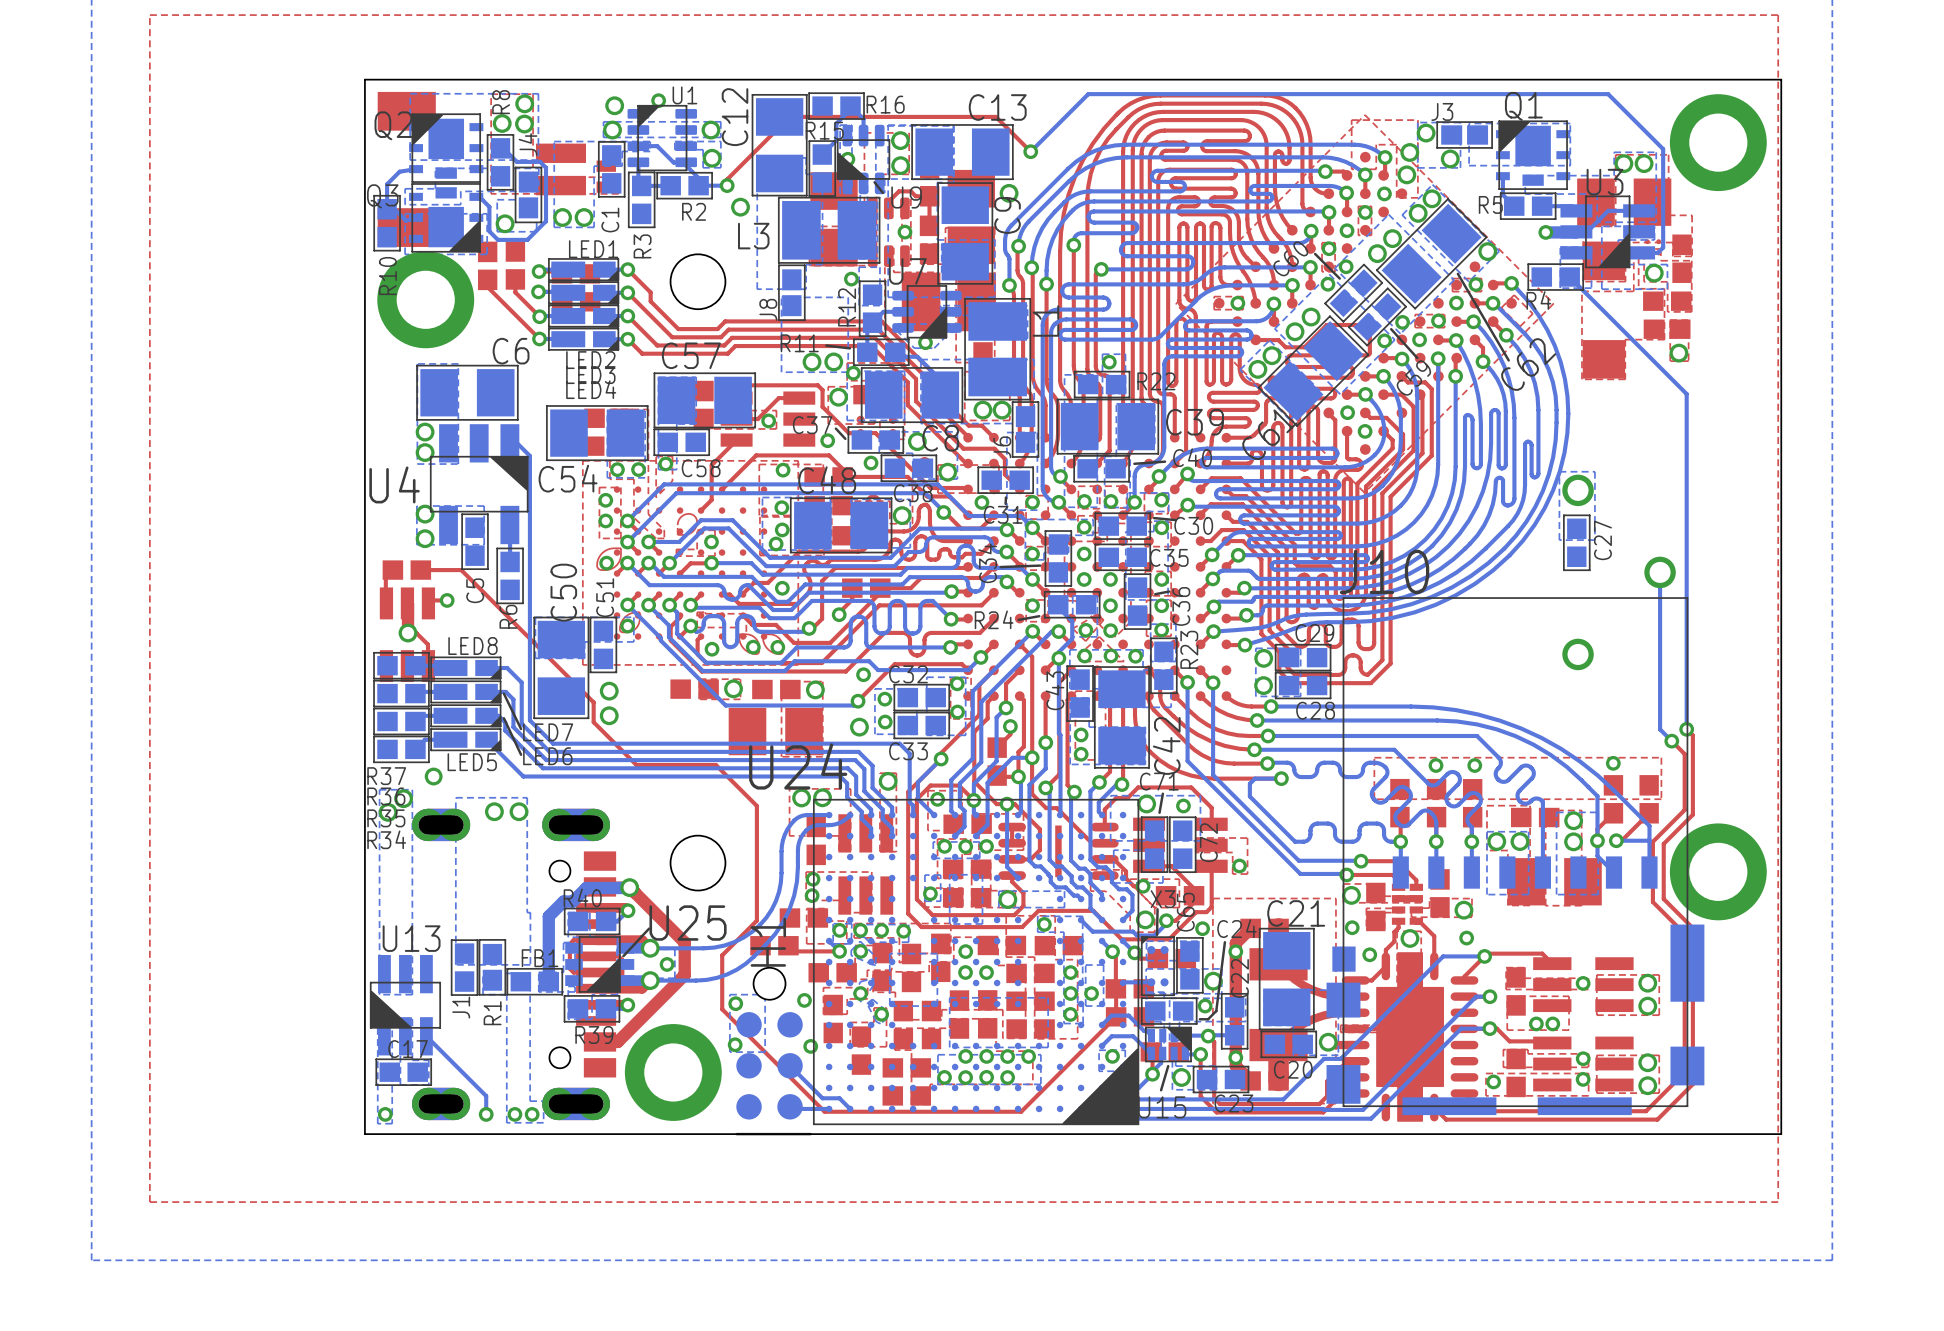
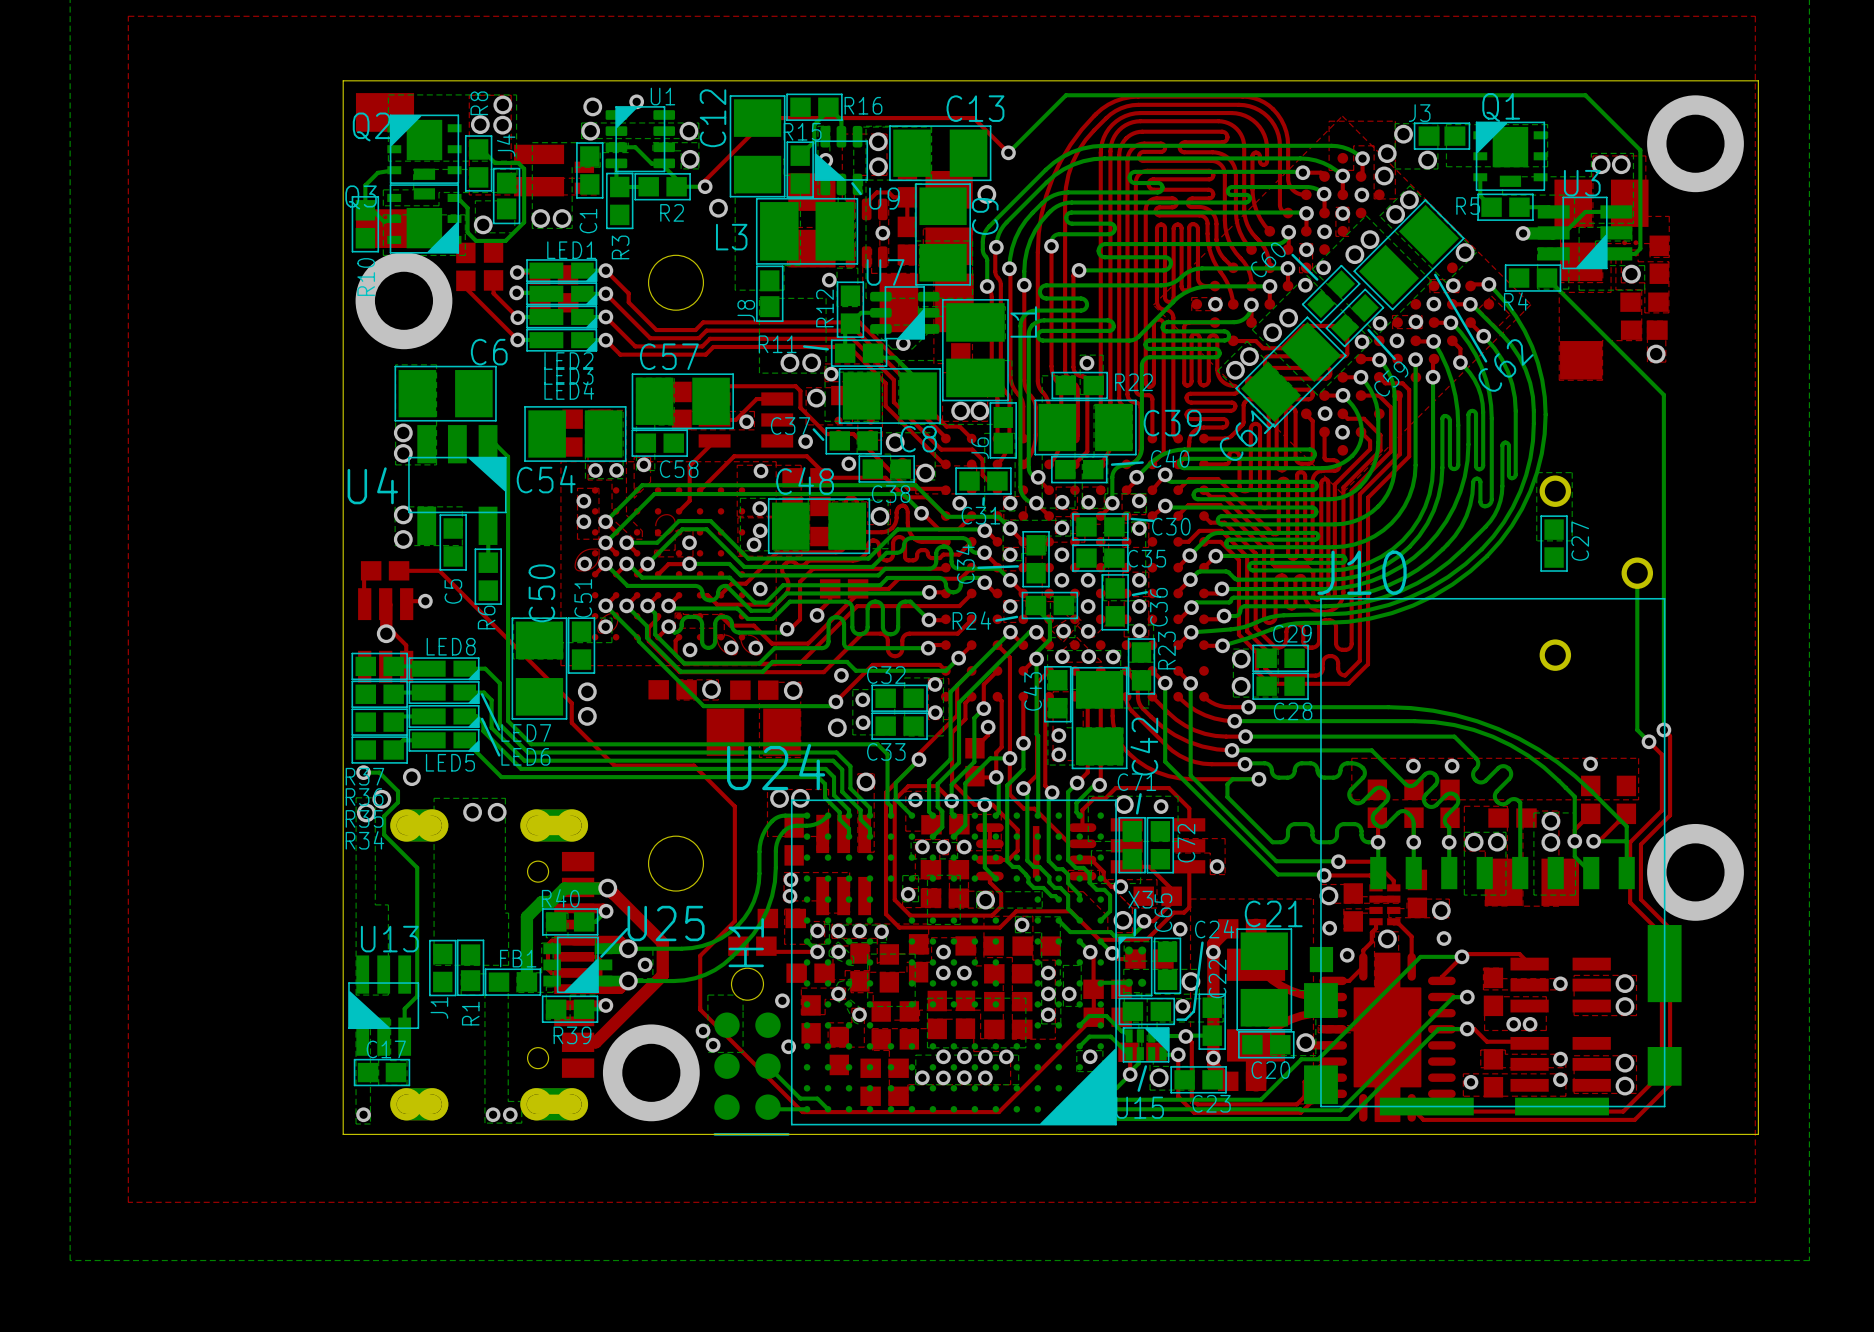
via: none -> (363, 772)
bottom zone outline: (410, 994) (412, 994) (412, 789) (379, 789) (379, 994) -> (388, 995) (388, 904) (375, 904) (375, 797) (356, 797) (356, 995) (357, 995)
via position: (735, 1003) -> (703, 1030)
bottom track: (426, 1036) (486, 1096) (486, 1114) -> (404, 1036) (404, 1008) (417, 996) (417, 867) (384, 834) (384, 816) (397, 802) (397, 791) (379, 772) (363, 772)
via: (486, 1114) -> none

